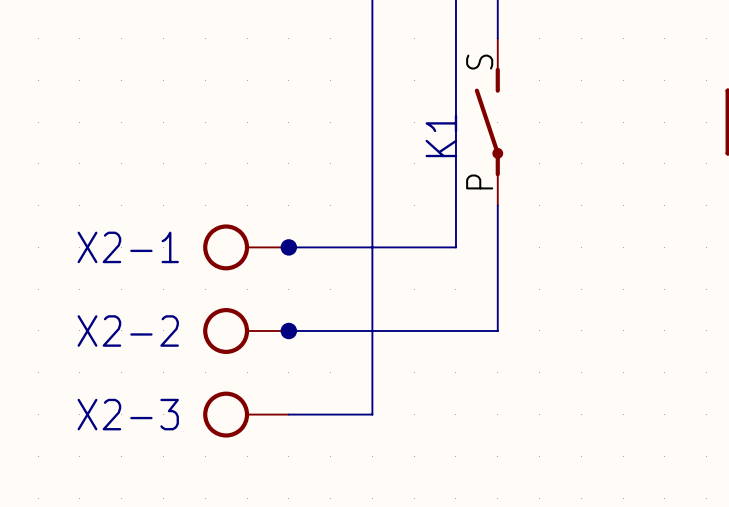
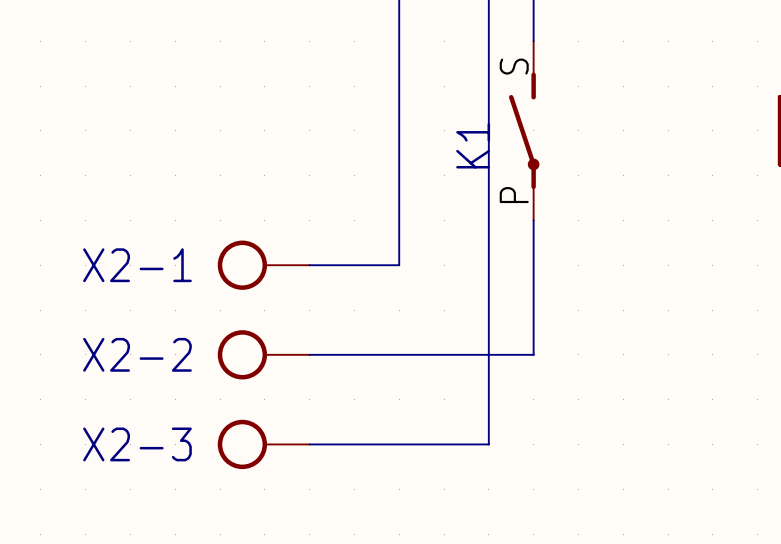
junction: (288, 247) -> none
wire: (455, 247) (372, 247) (372, 414) -> (488, 265) (488, 444) (399, 444)
junction: (288, 330) -> none

